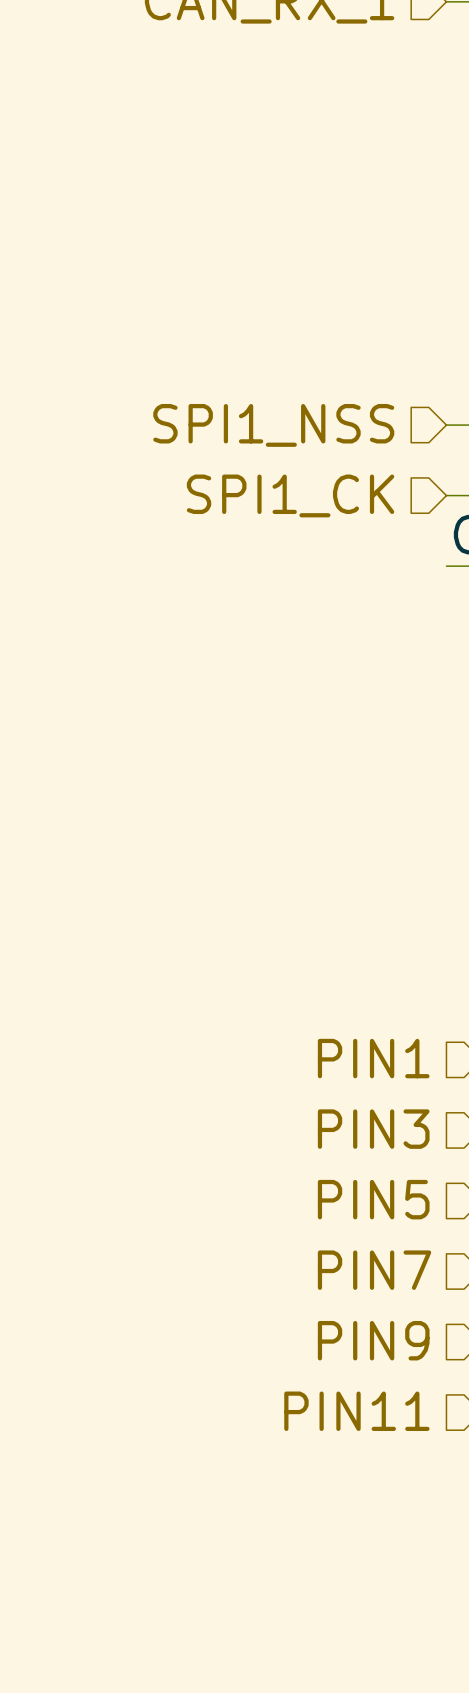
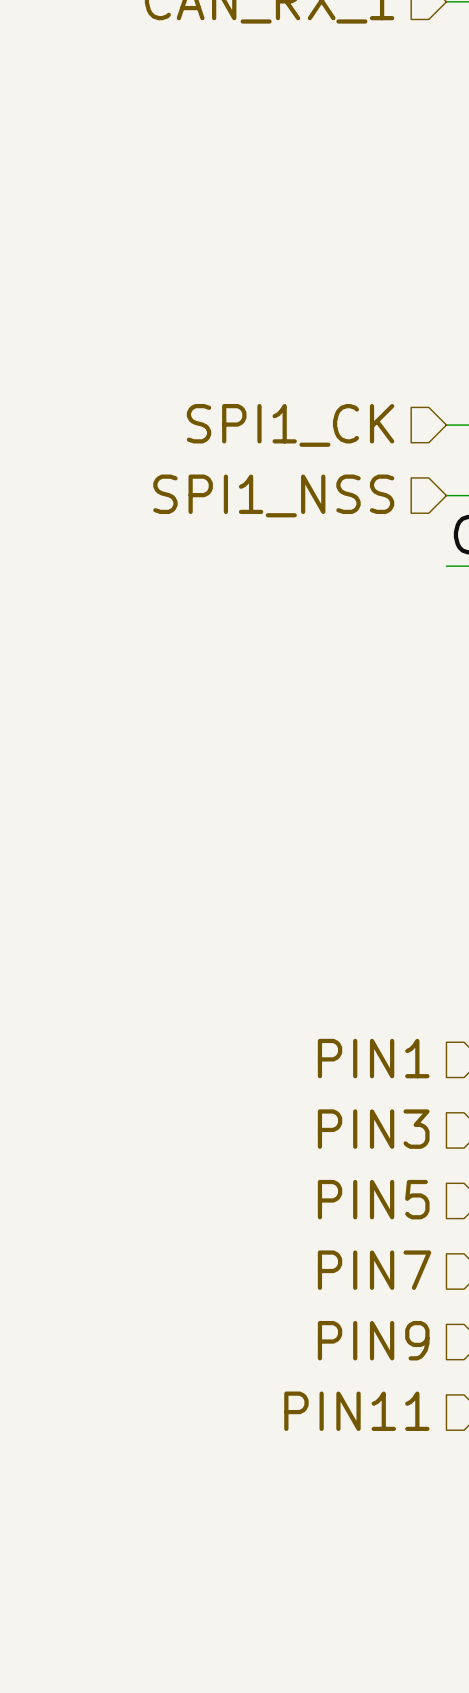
hierarchical label: SPI1_NSS (273, 425) -> SPI1_CK (290, 425)
hierarchical label: SPI1_CK (290, 495) -> SPI1_NSS (273, 495)

